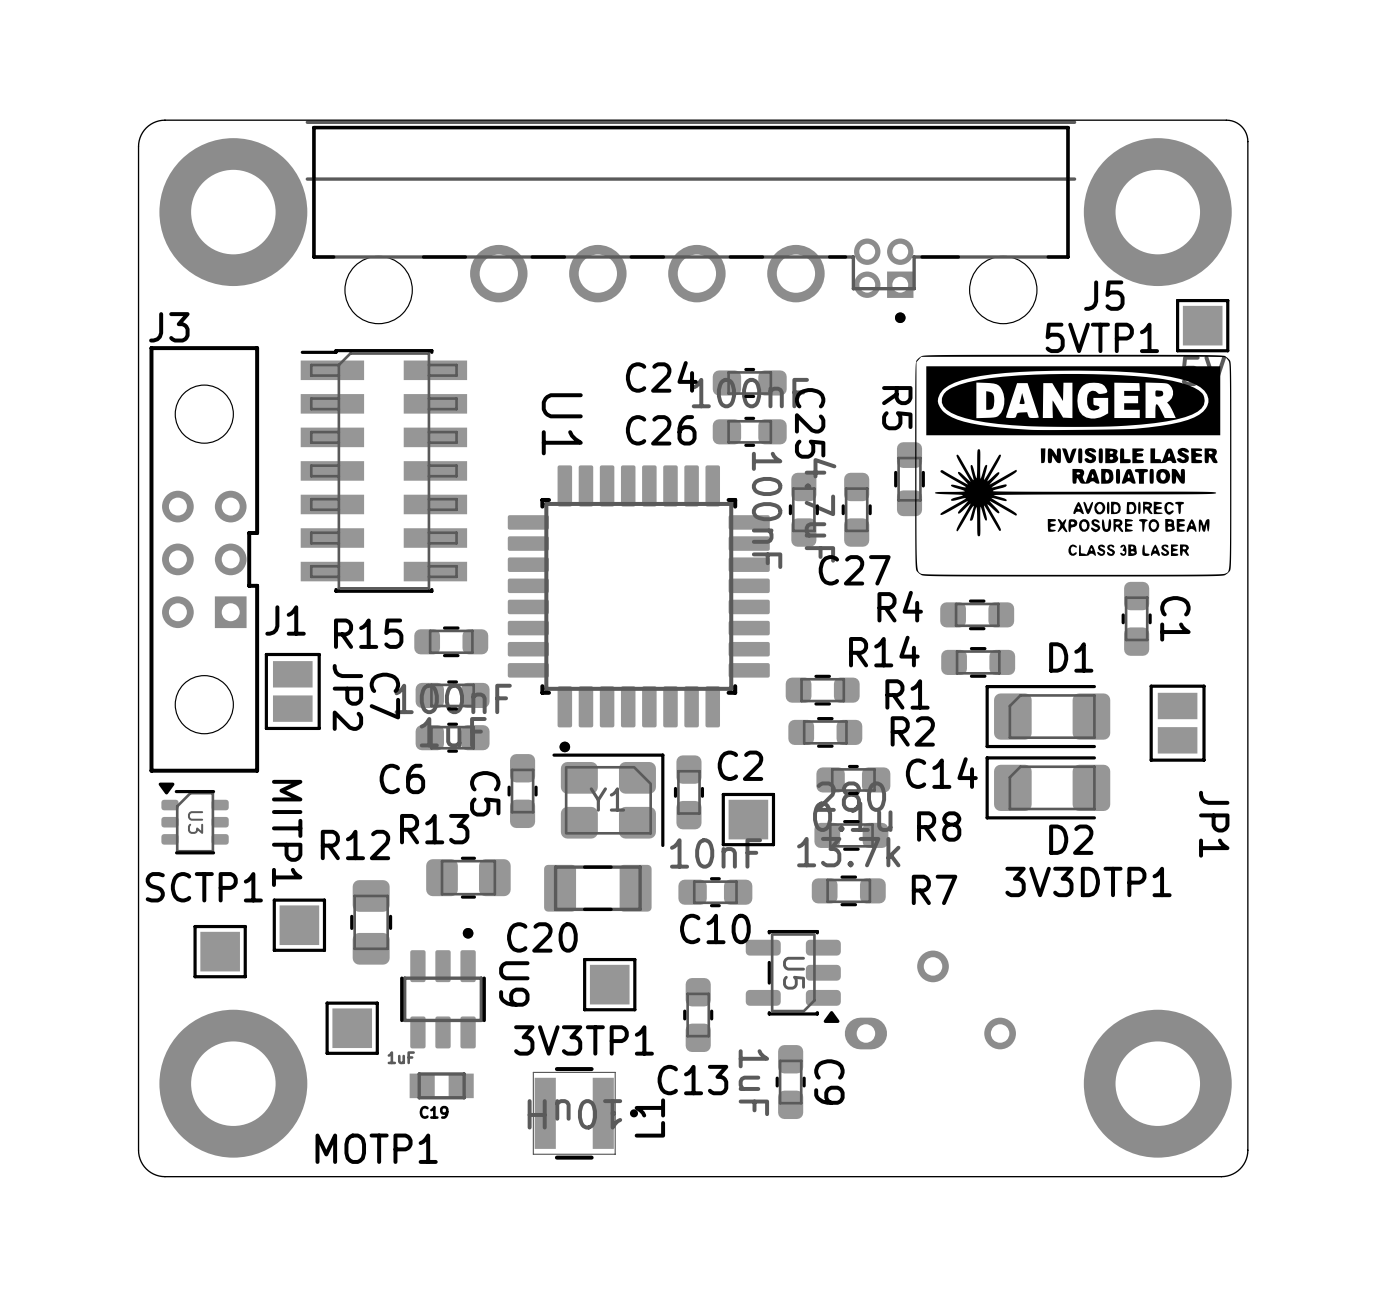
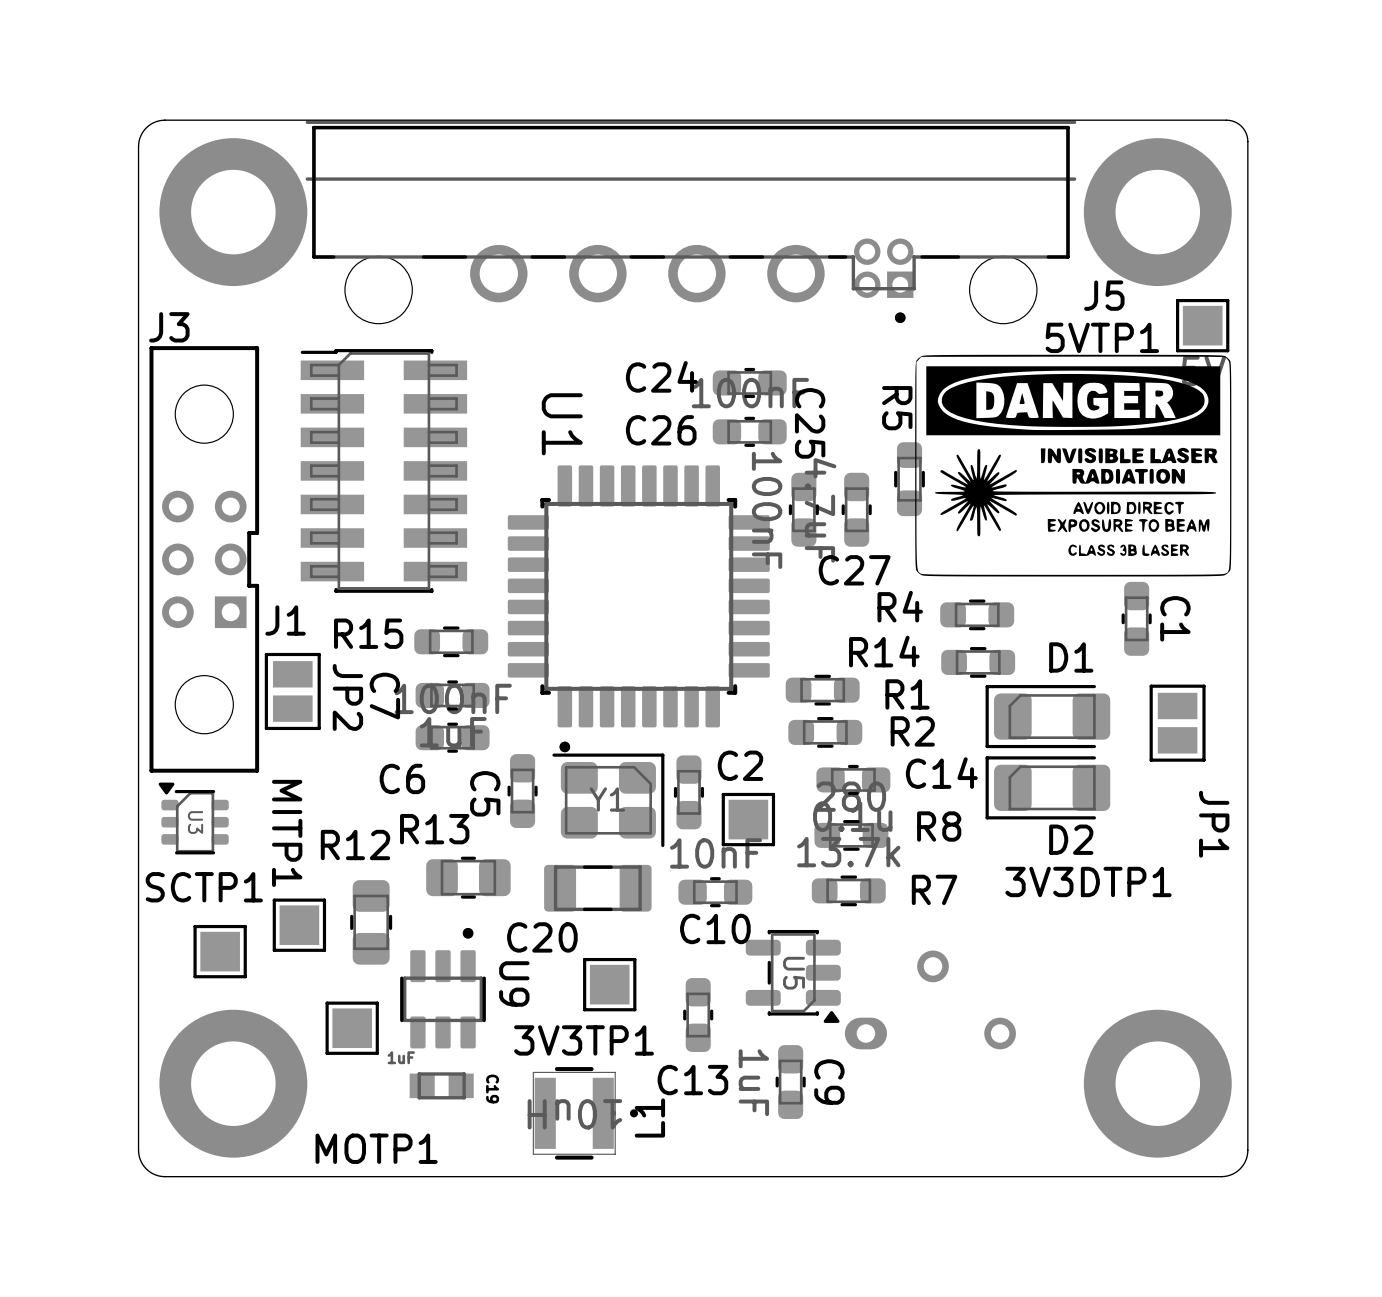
C19 name rotation: 0° (434, 1112) -> 90° clockwise (492, 1088)
C19 name position: C19 (434, 1112) -> C19 (492, 1088)

